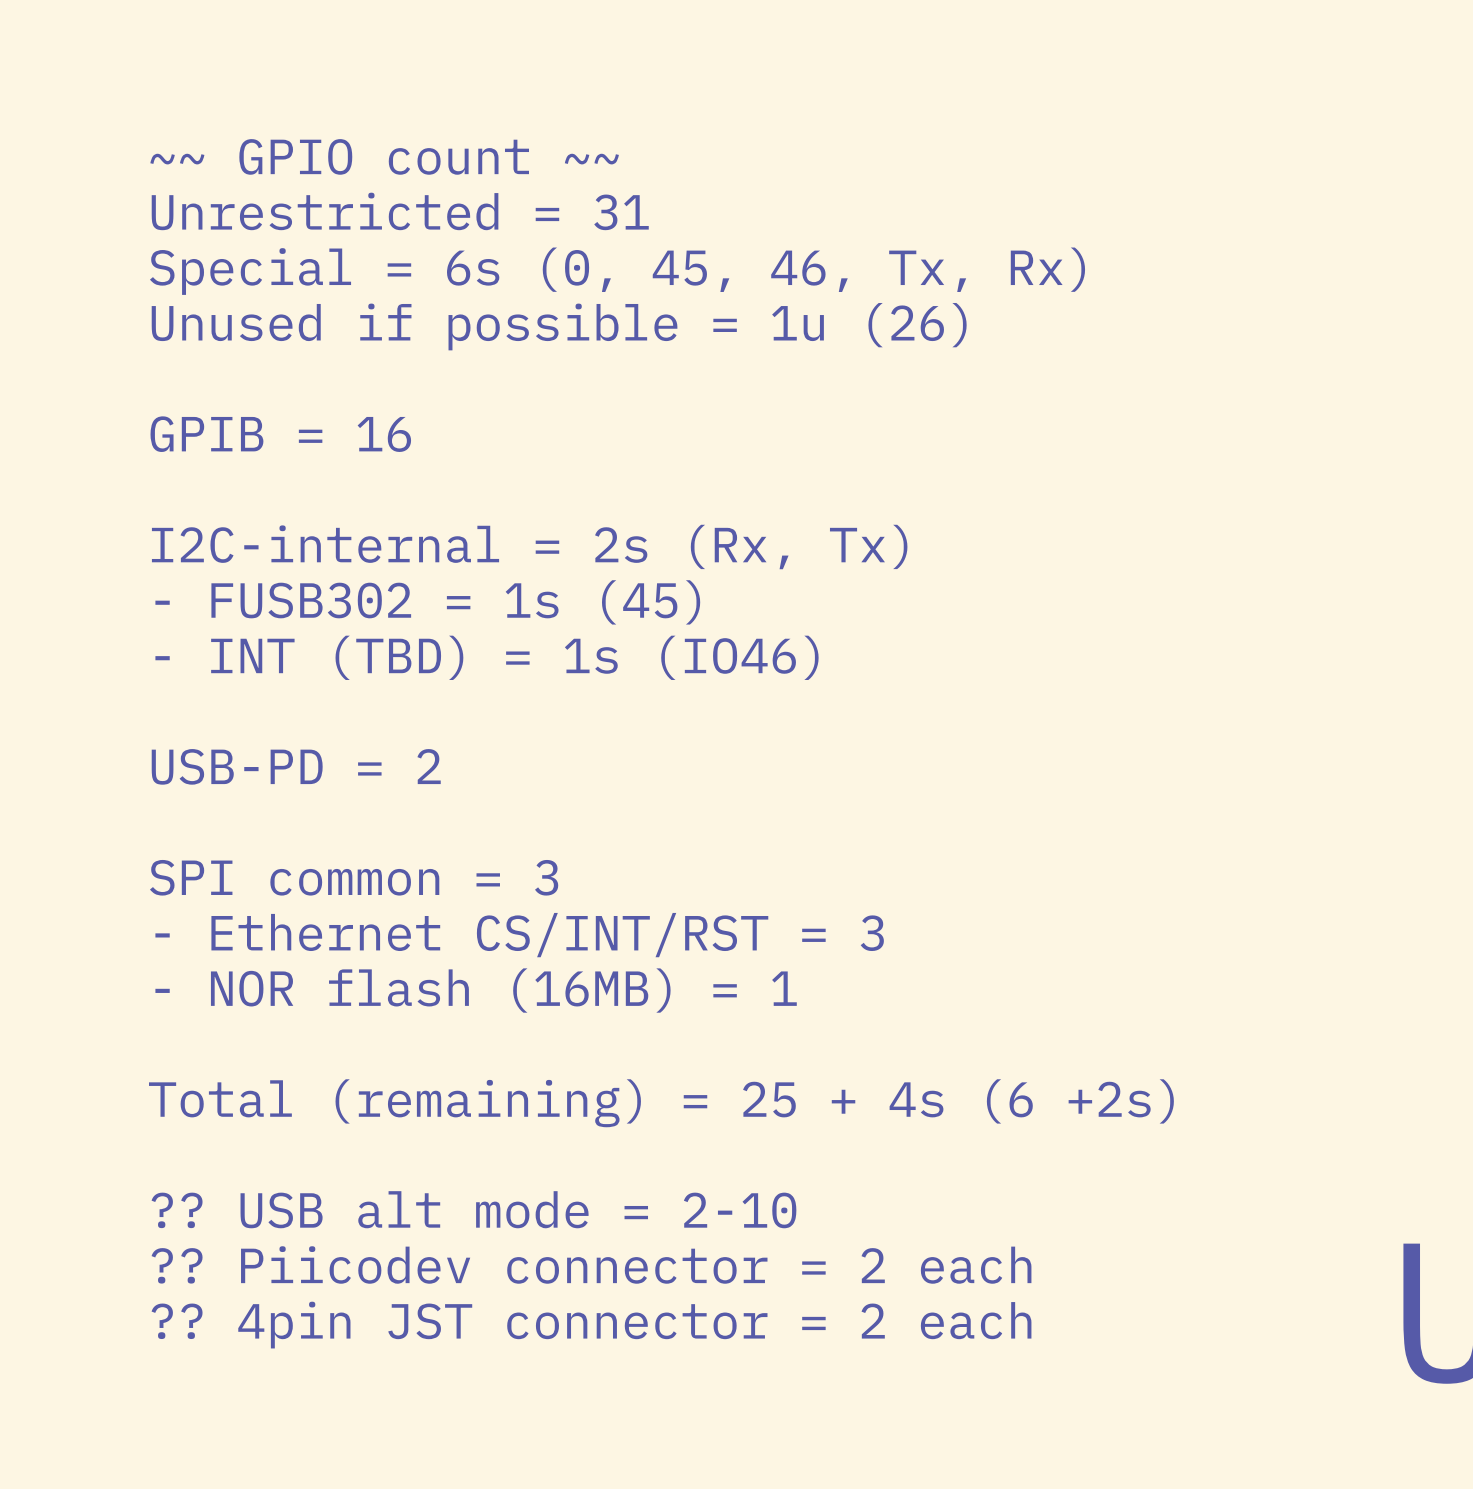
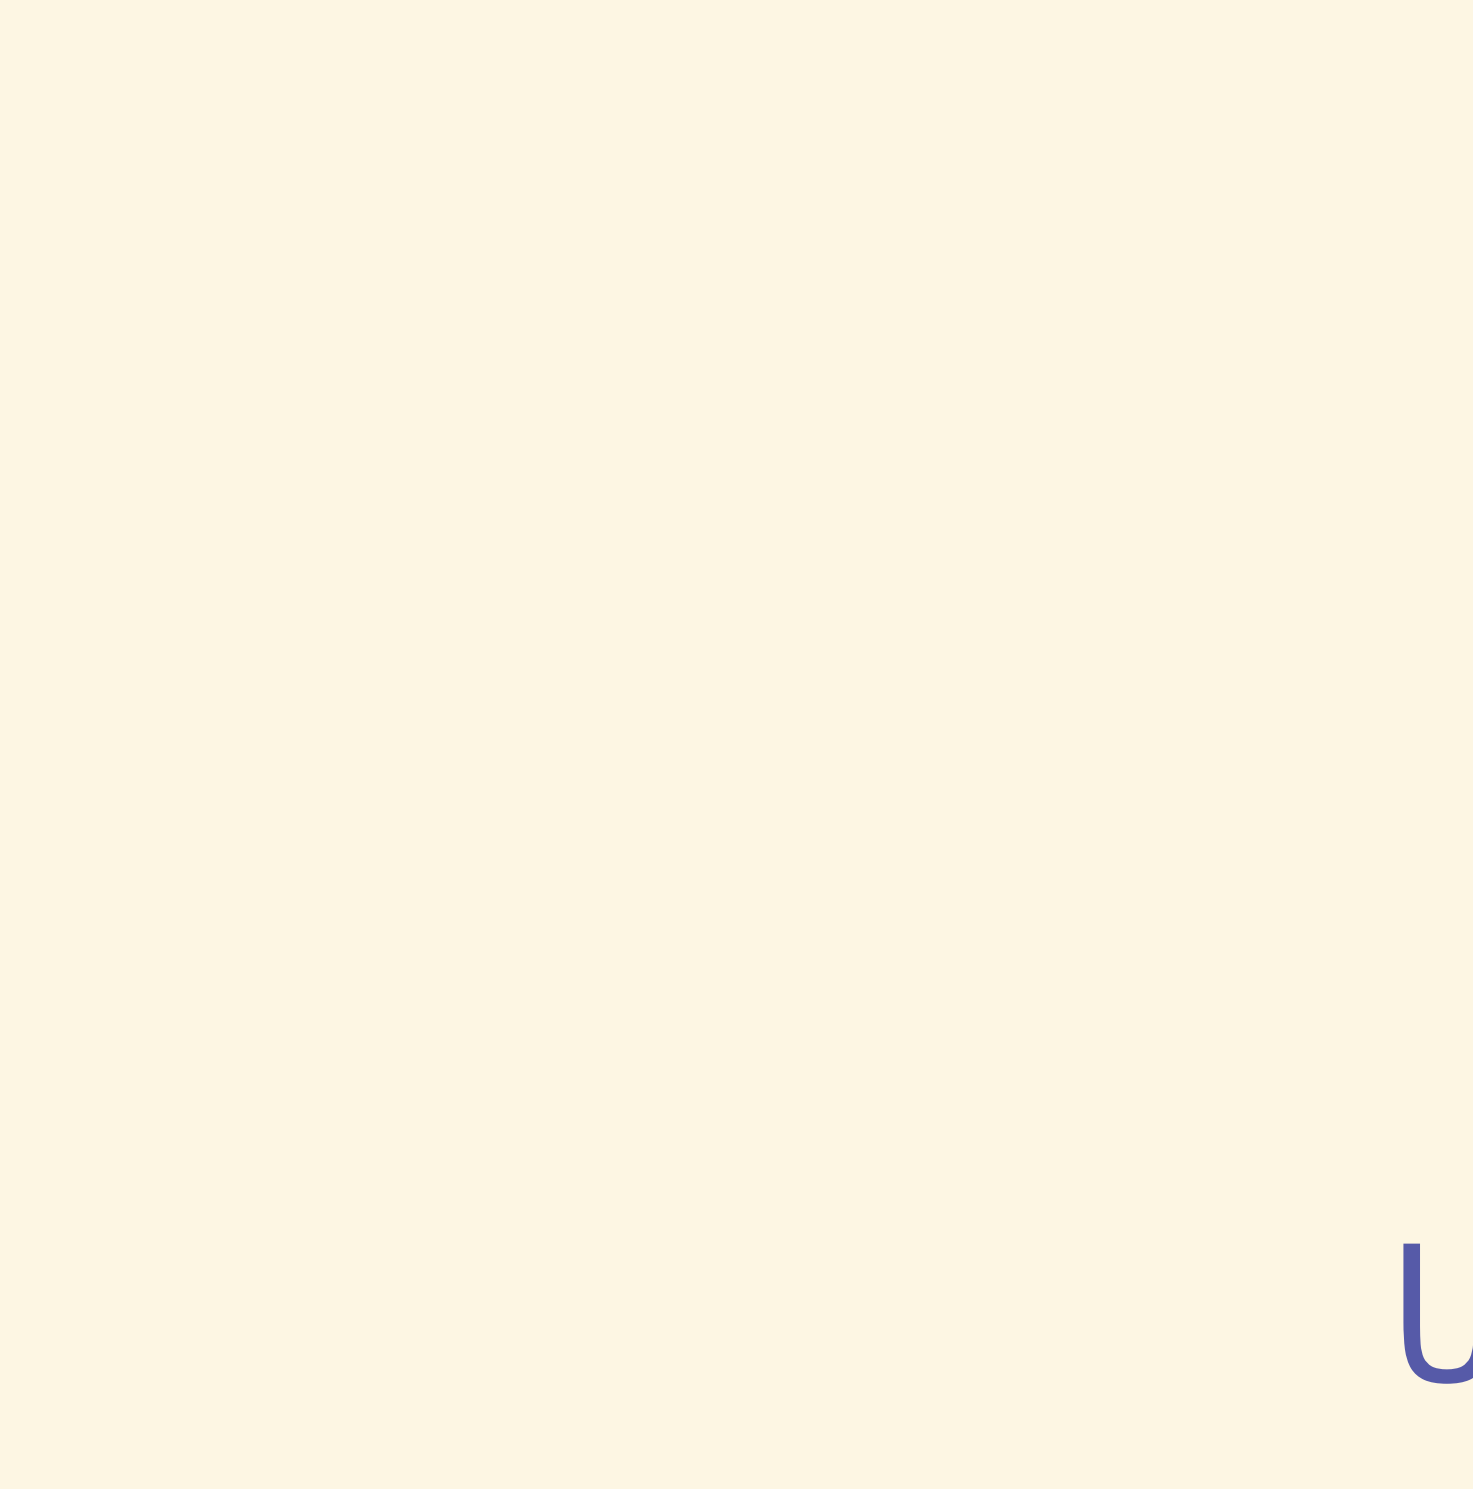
text: ~~ GPIO count ~~ (384, 156) -> none
text: Unrestricted = 31 (400, 211) -> none
text: Special = 6s (0, 45, 46, Tx, Rx) (617, 271) -> none
text: Unused if possible = 1u (26) (559, 326) -> none
text: GPIB = 16 (280, 434) -> none
text: I2C-internal = 2s (Rx, Tx) (529, 547) -> none
text: - FUSB302 = 1s (45) (427, 602) -> none
text: - INT (TBD) = 1s (IO46) (487, 657) -> none
text: USB-PD = 2 (296, 766) -> none
text: SPI common = 3 (354, 877) -> none
text: - Ethernet CS/INT/RST = 3 (519, 935) -> none
text: - NOR flash (16MB) = 1 (476, 990) -> none
text: Total (remaining) = 25 + 4s (6 +2s) (661, 1103) -> none
text: ?? USB alt mode = 2-10 (473, 1209) -> none
text: ?? Piicodev connector = 2 each (591, 1264) -> none
text: ?? 4pin JST connector = 2 each (591, 1325) -> none

